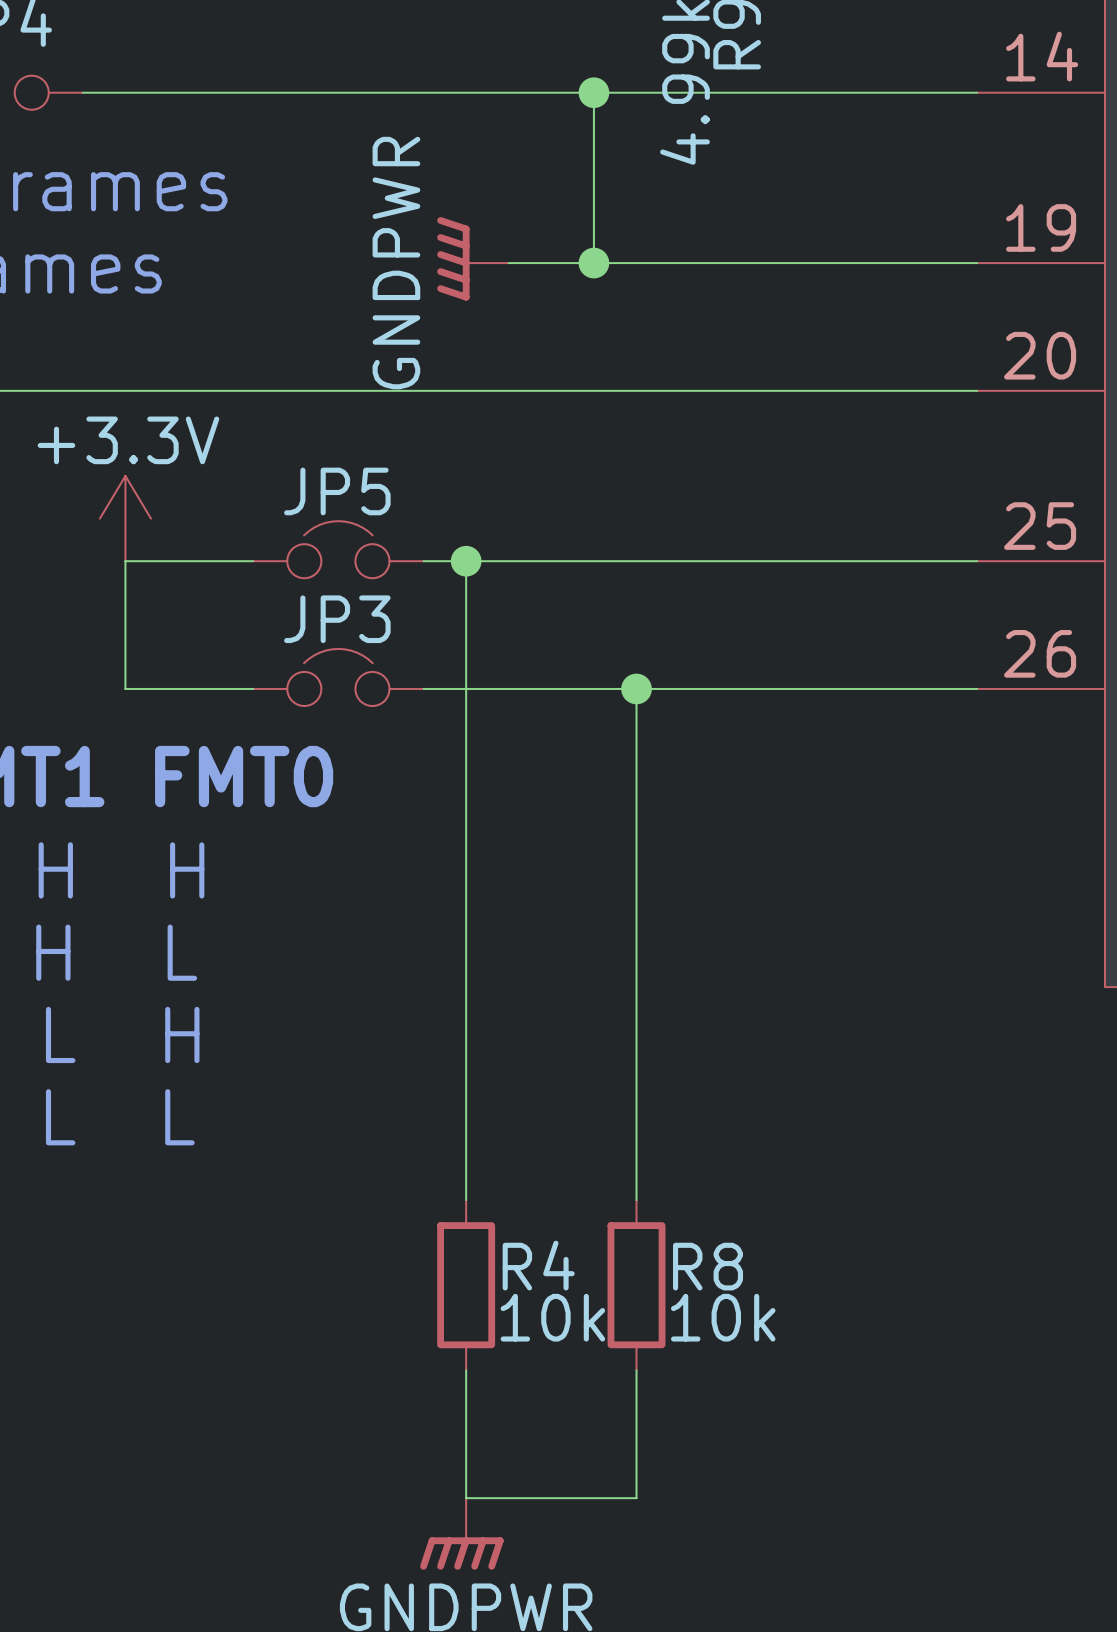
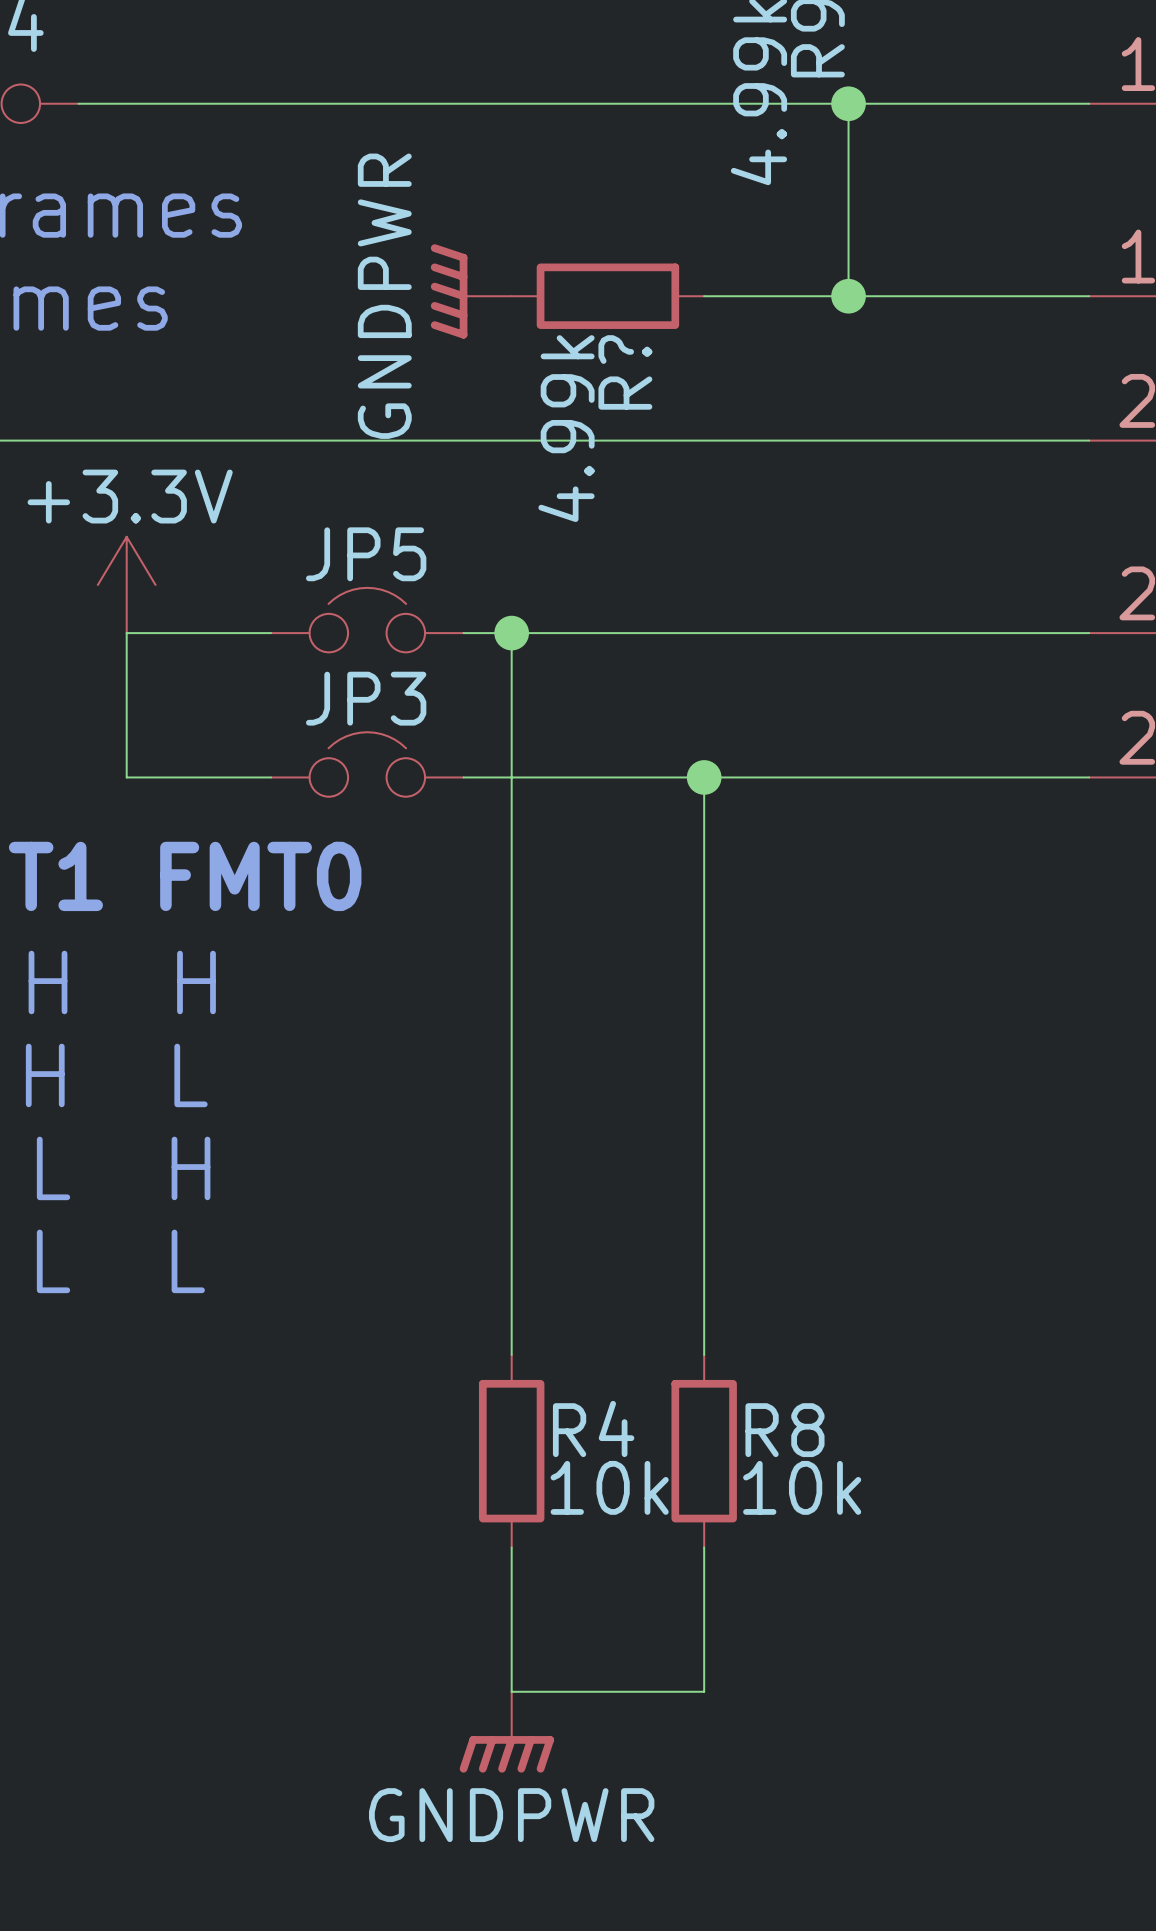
wire: (593, 92) (593, 263) -> (848, 103) (848, 296)
junction: (593, 92) -> none
junction: none -> (848, 103)
power symbol position: GNDPWR (472, 258) -> GNDPWR (471, 291)
wire: (508, 263) (636, 263) -> none
R?: none -> 4.99k (607, 296)
junction: (593, 263) -> none
junction: none -> (848, 296)

